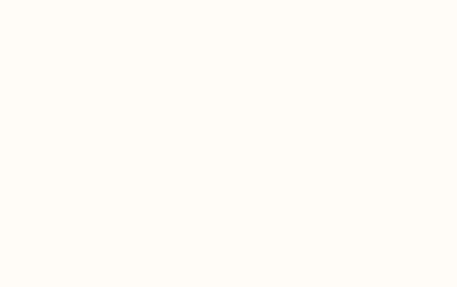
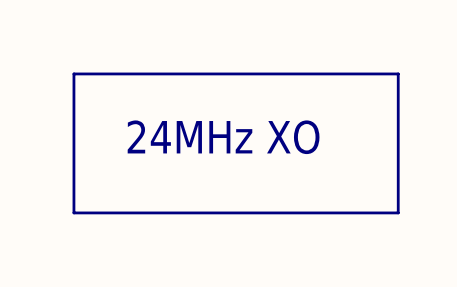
line: none -> (73, 73) (398, 73) (398, 212) (73, 212) (73, 73)
text: none -> 24MHz XO (223, 137)

